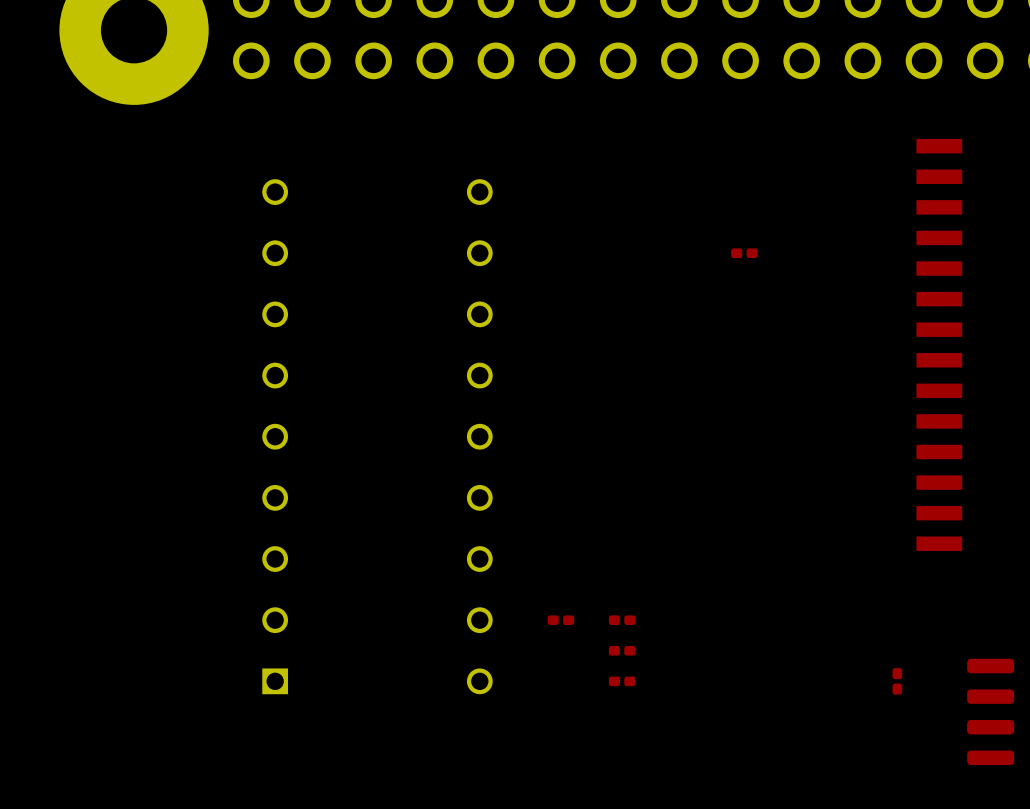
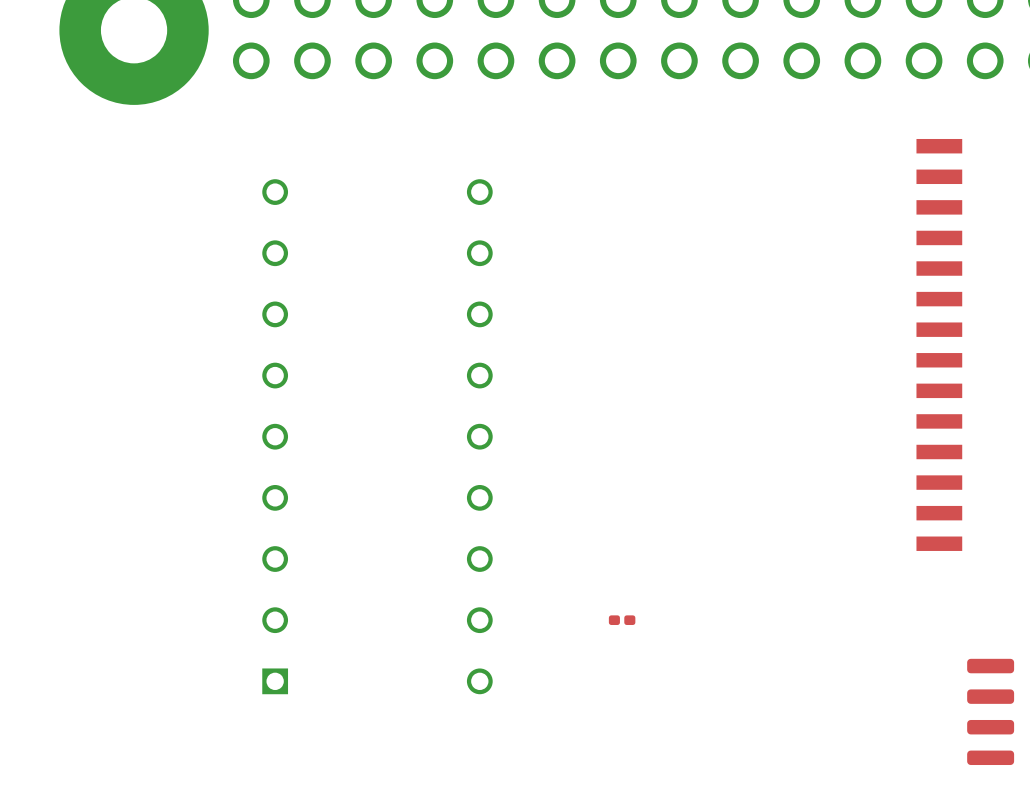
part: (744, 253) -> none
part: (560, 620) -> none
part: (622, 650) -> none
part: (622, 681) -> none
part: (897, 681) -> none

